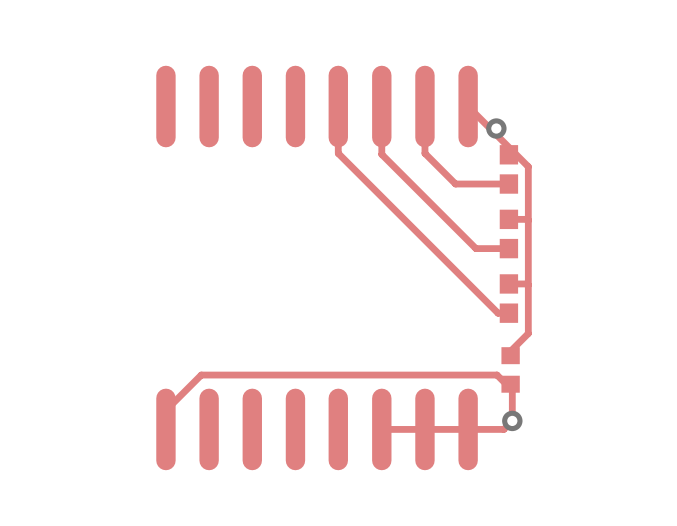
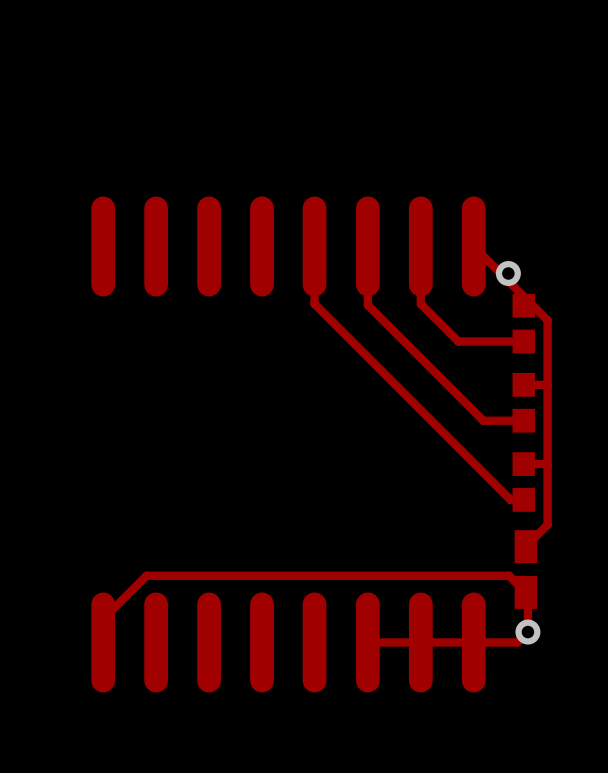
part footprint: [501, 347, 520, 393] -> [514, 530, 538, 609]

